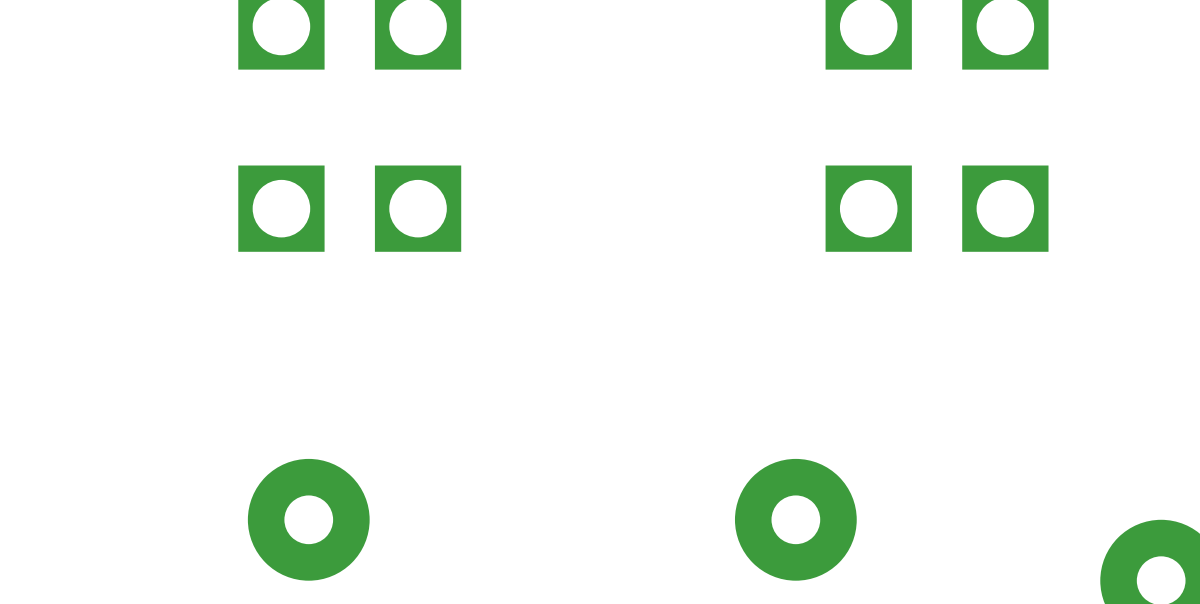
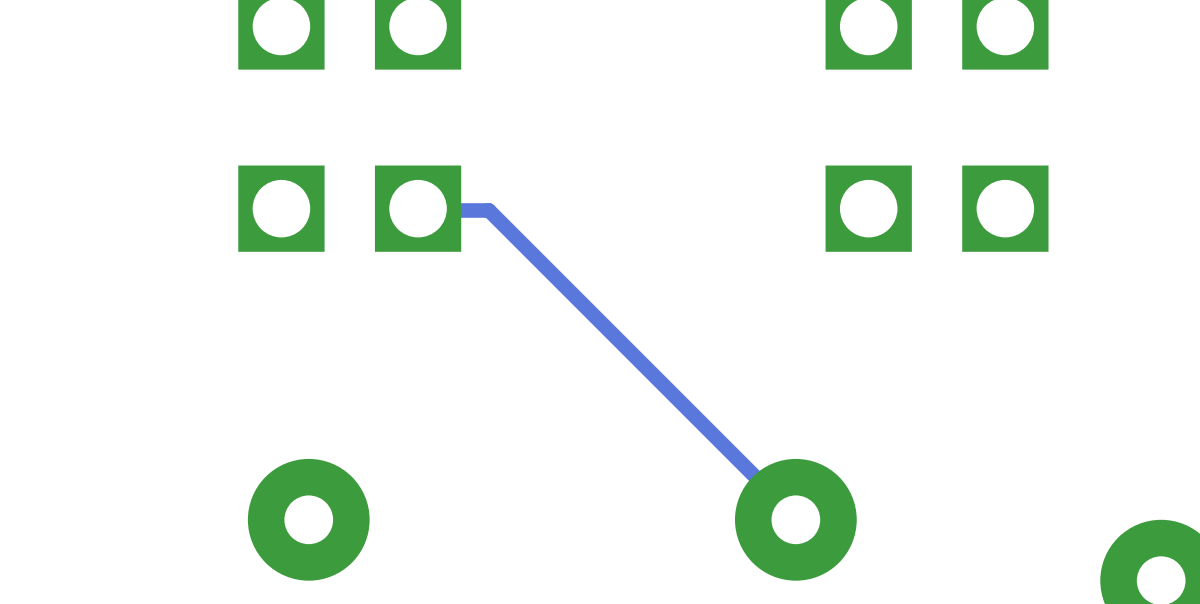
track: none -> (418, 208) (423, 210) (488, 210) (795, 517) (795, 519)

